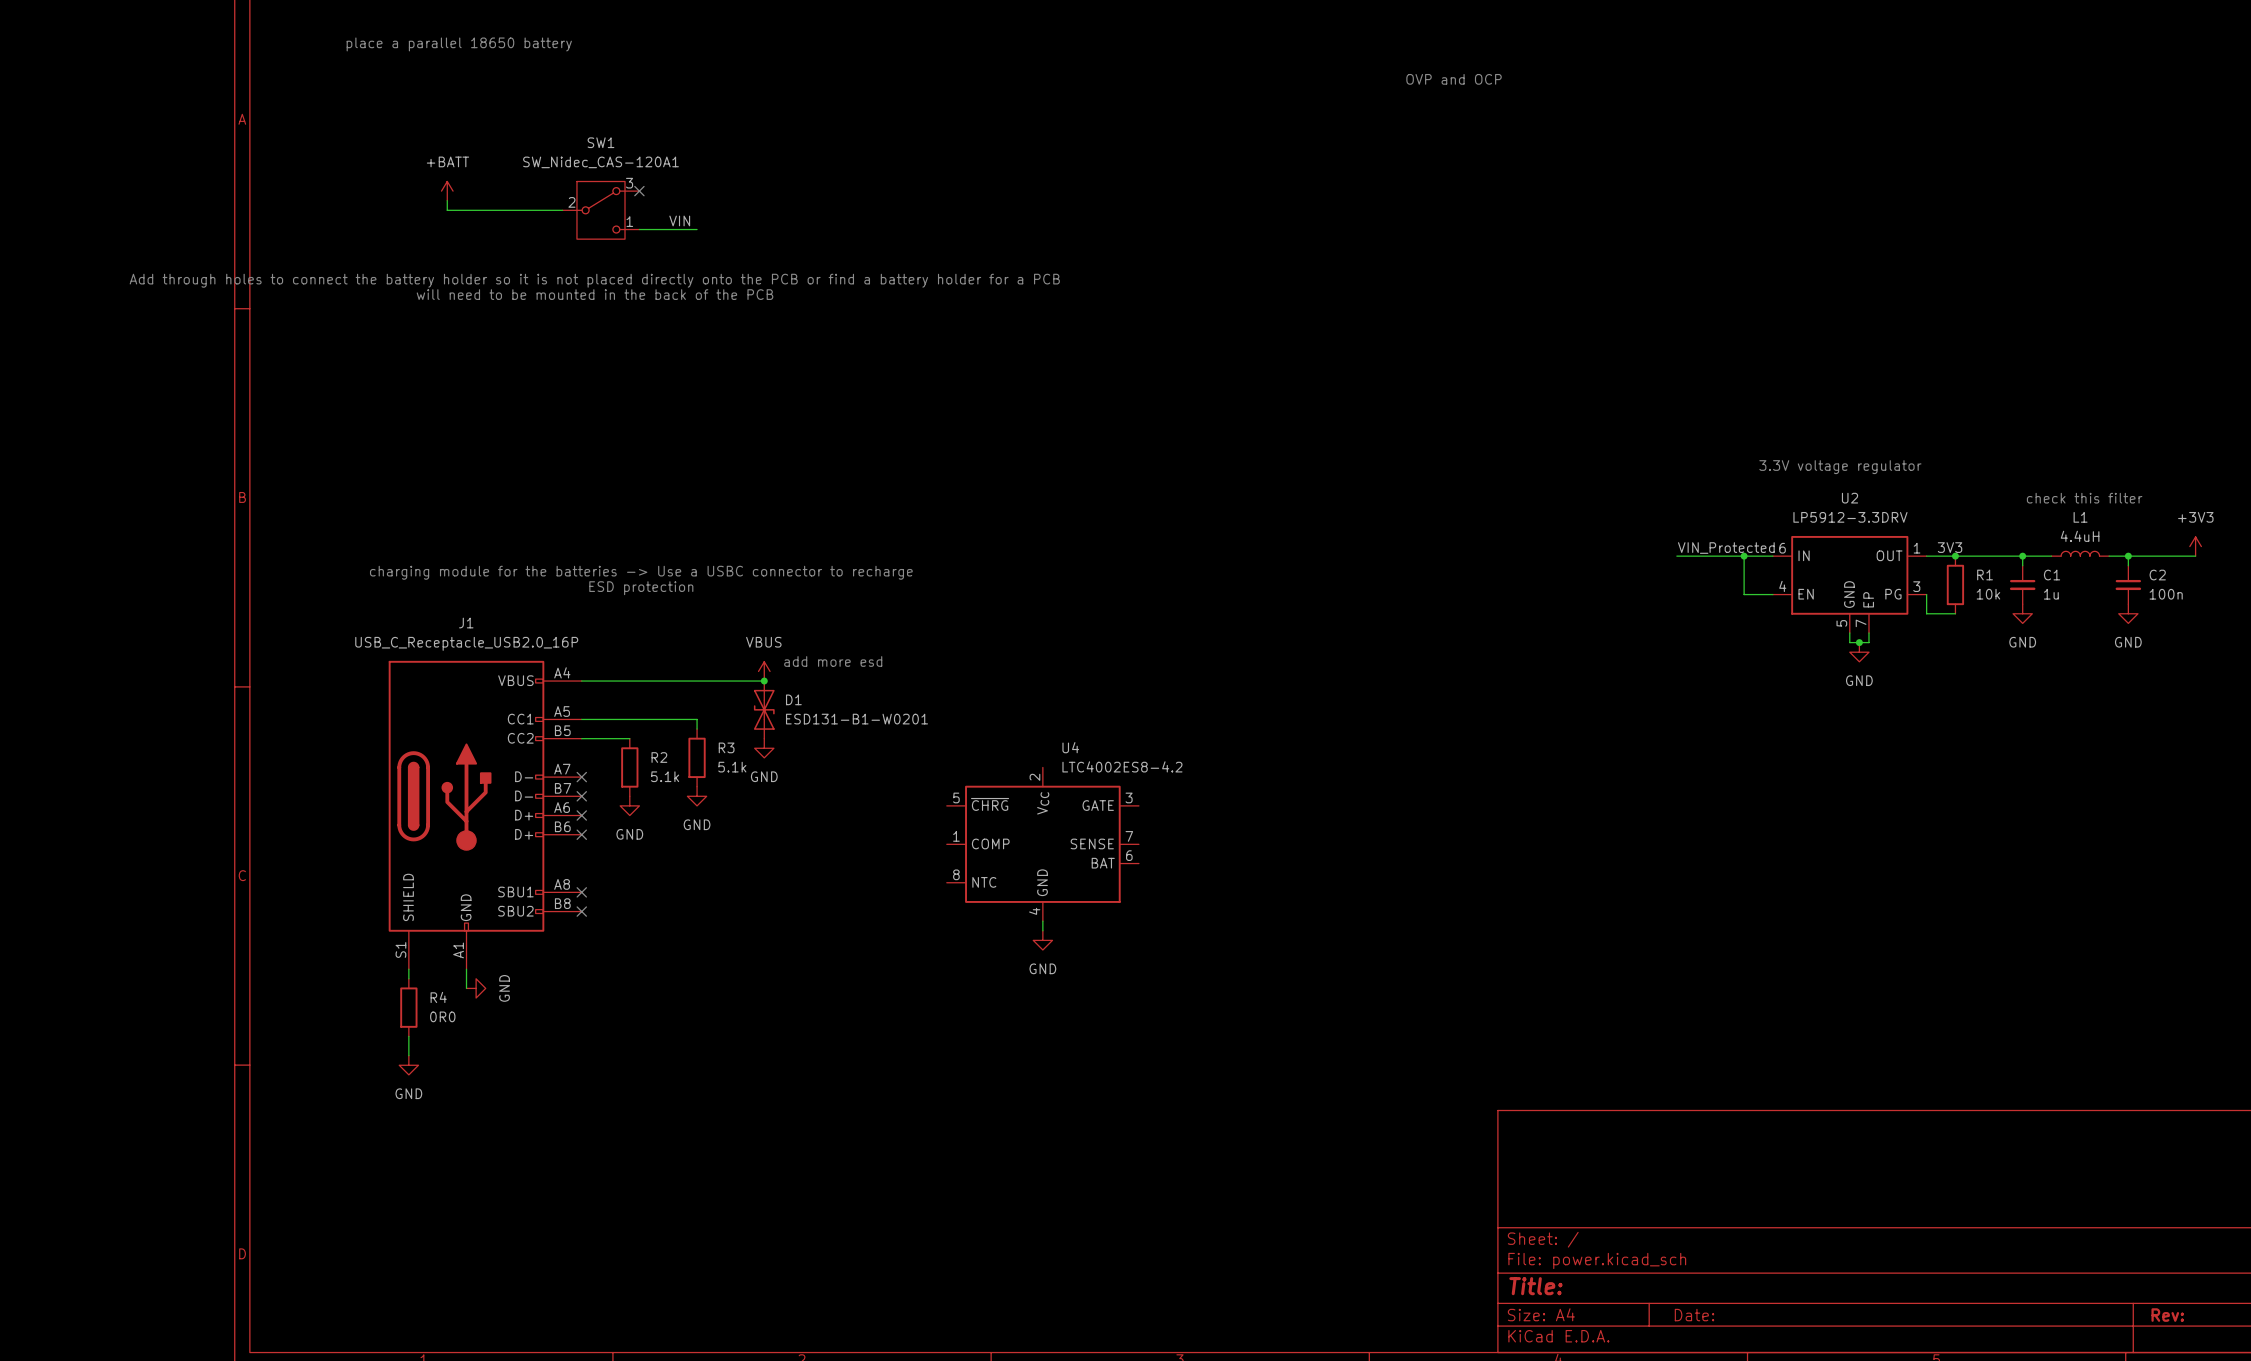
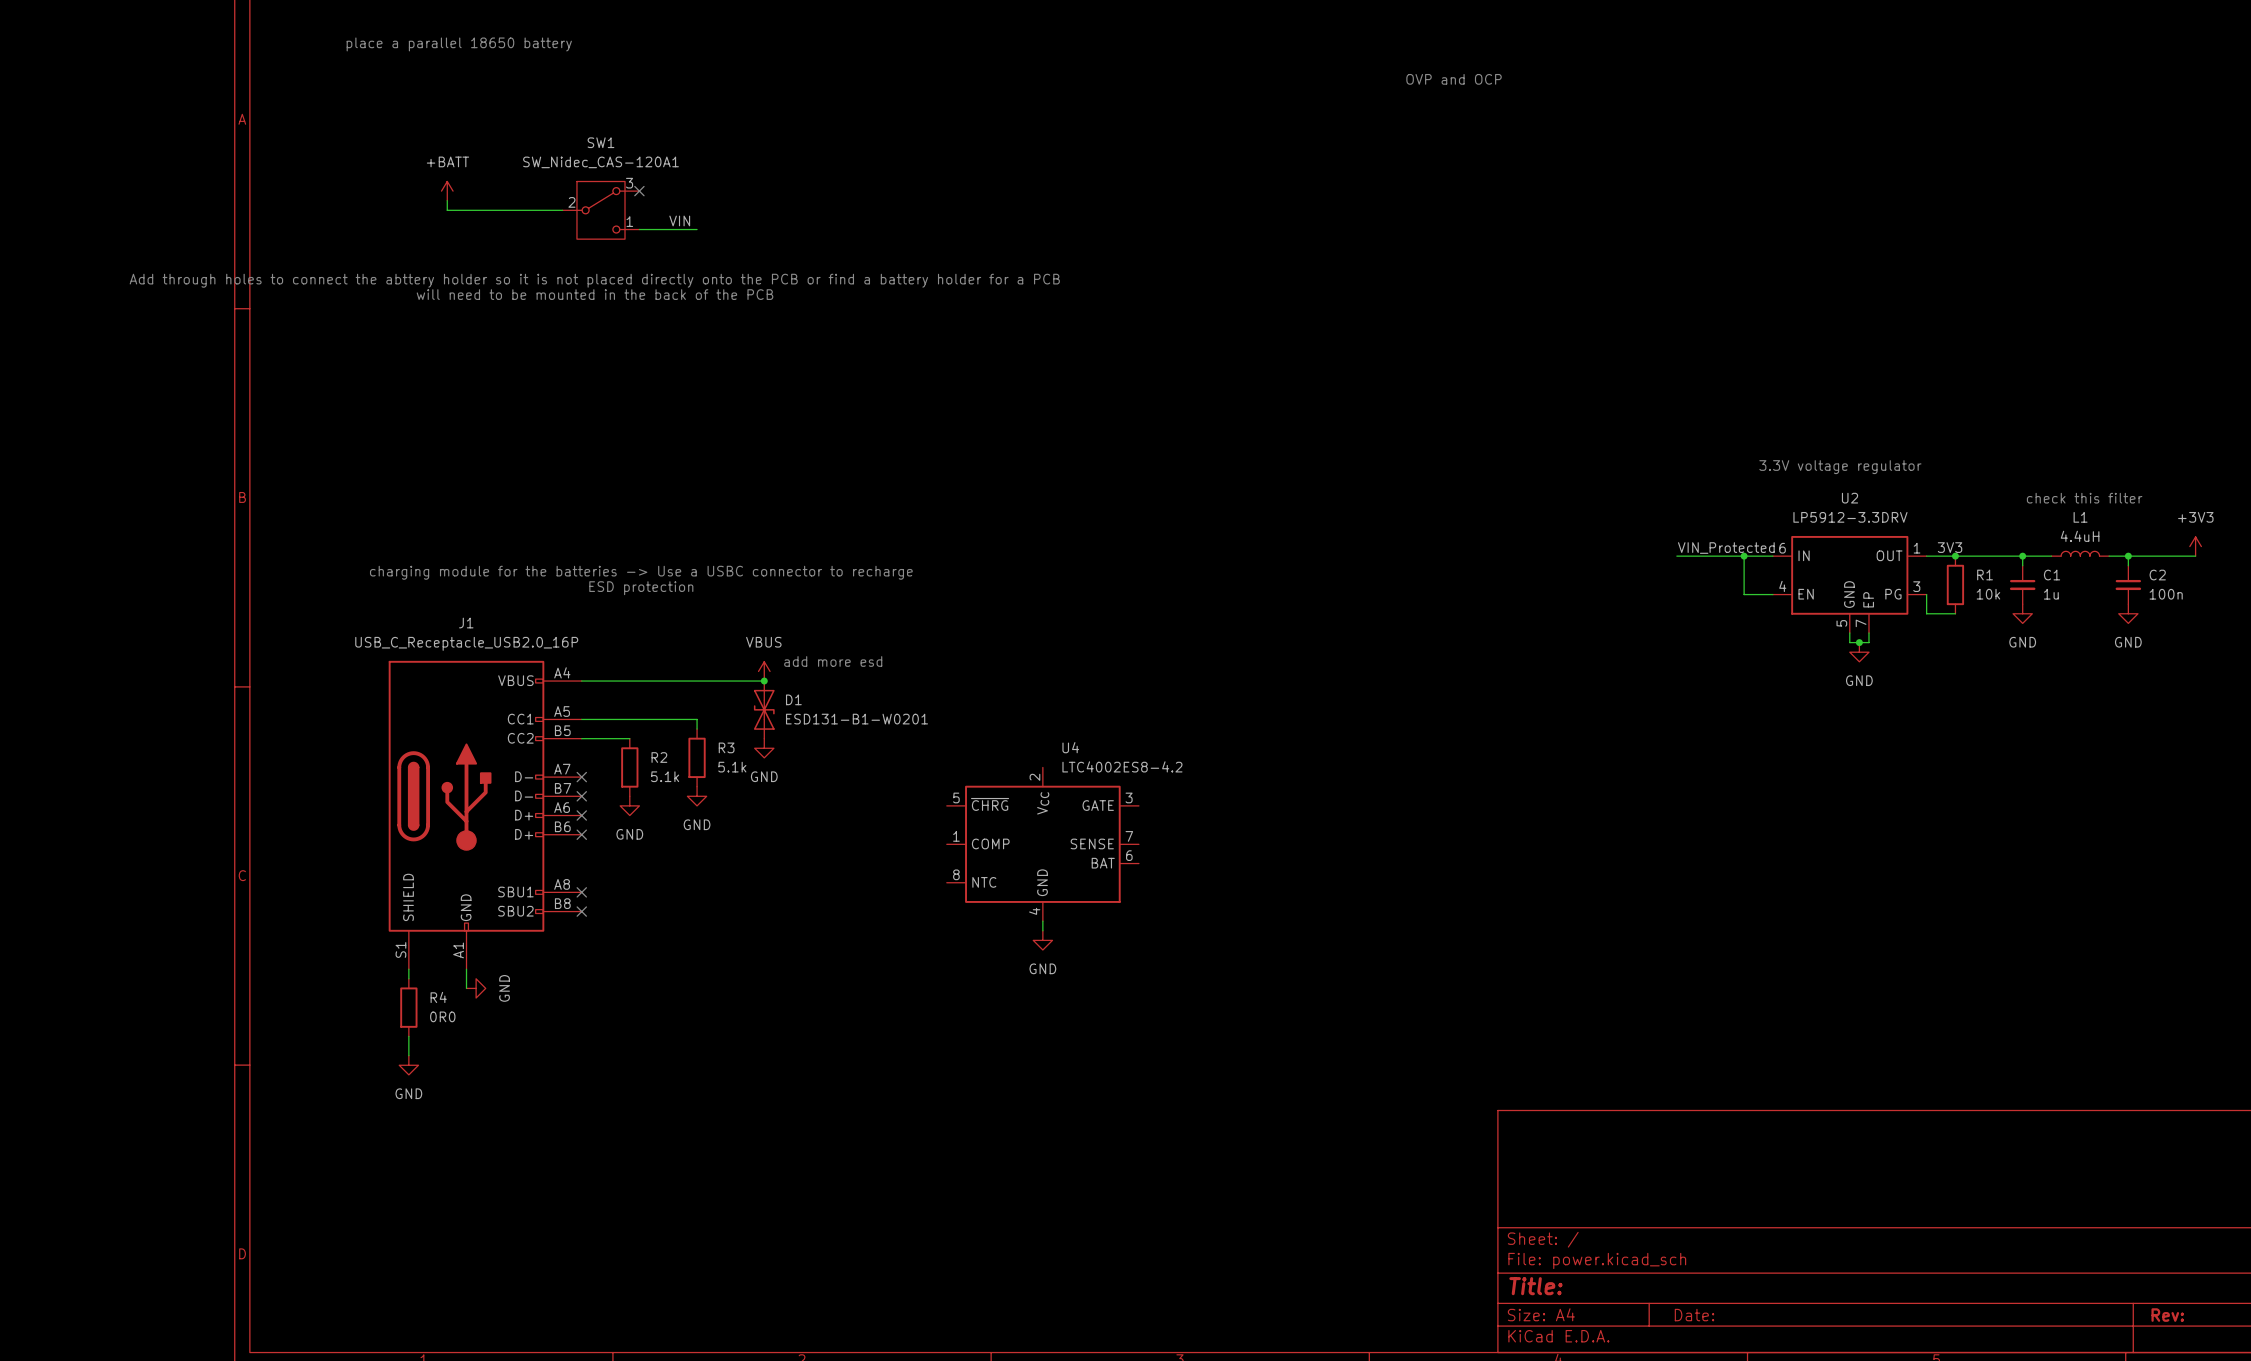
text: Add through holes to connect the battery holder so it is not placed directly onto the PCB or find a battery holder for a PCB (594, 280) -> Add through holes to connect the abttery holder so it is not placed directly onto the PCB or find a battery holder for a PCB (594, 280)

